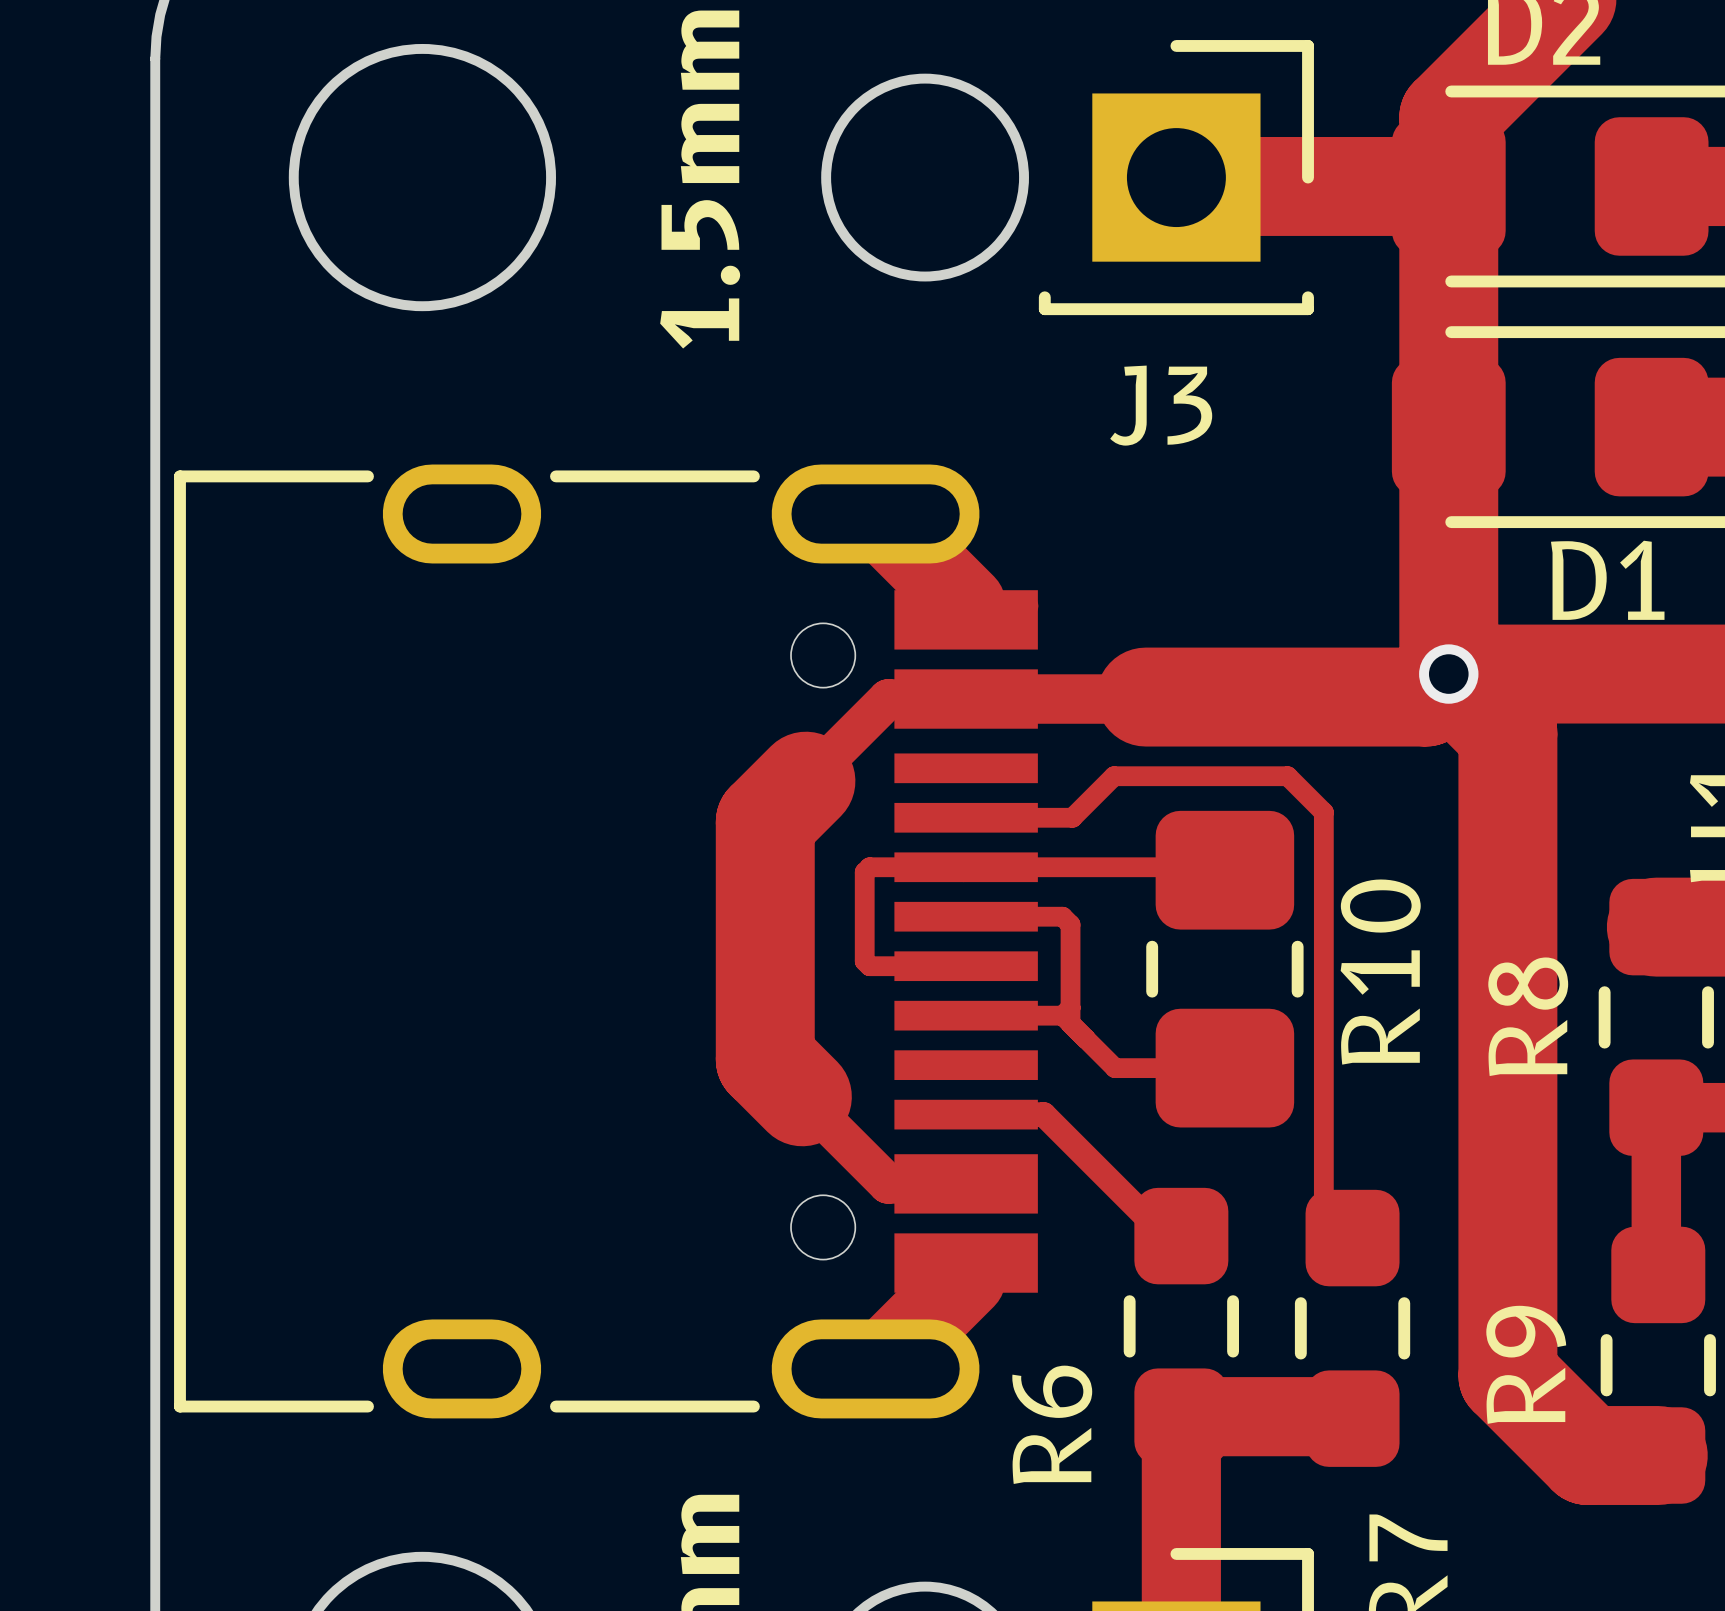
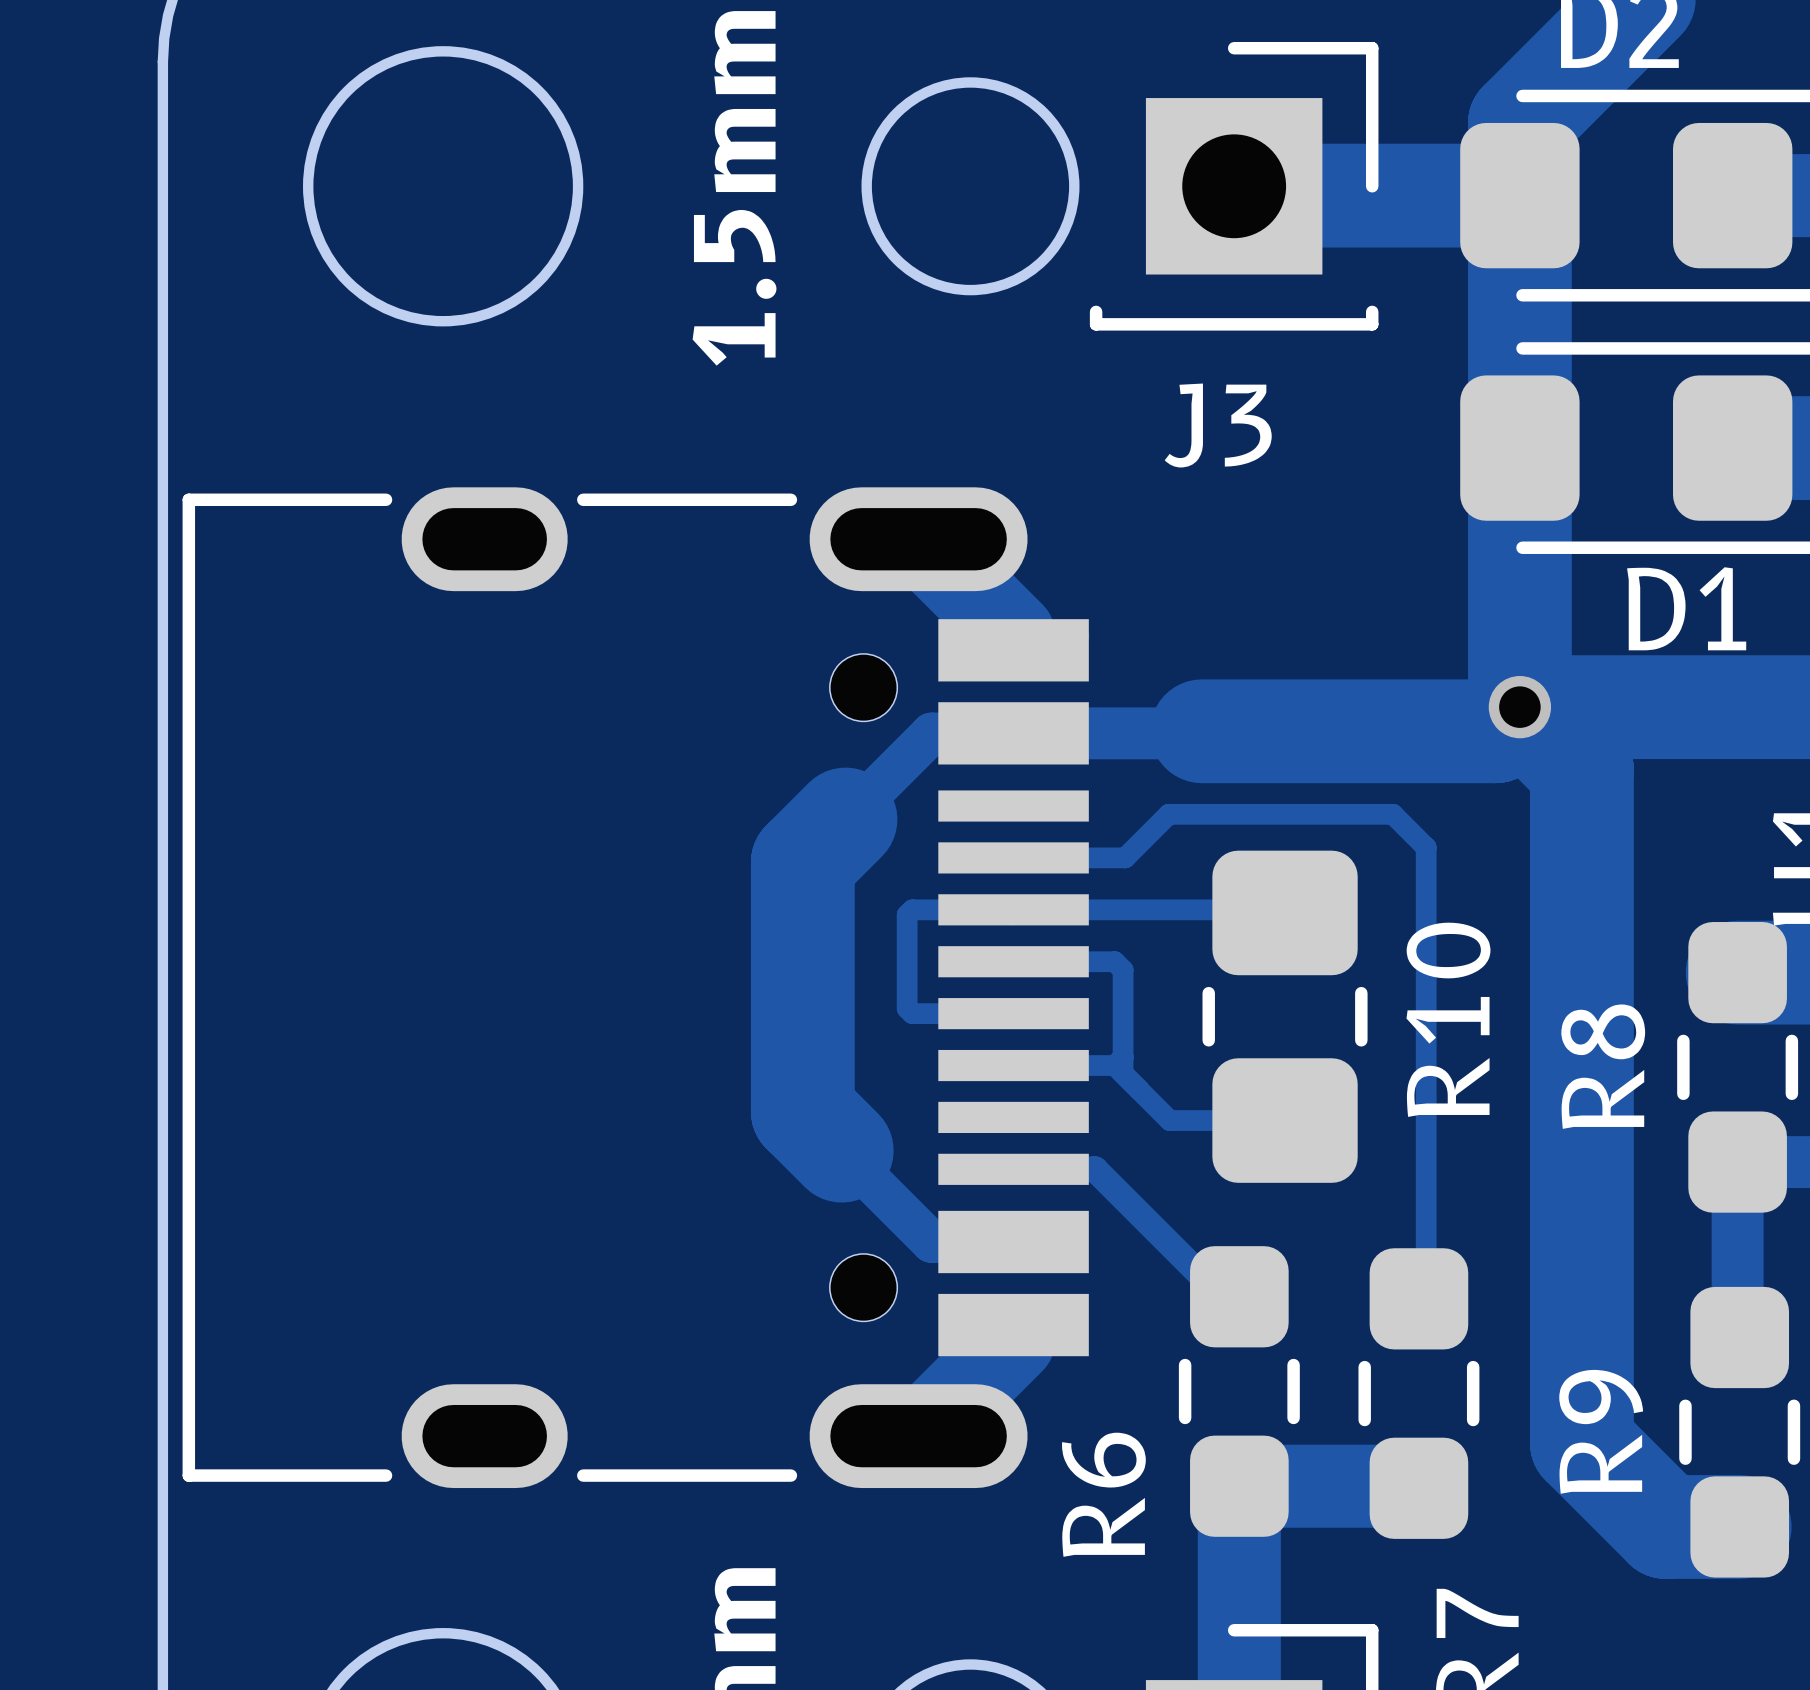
track: (1287, 776) (1323, 812) (1323, 1198) (1359, 1234) -> (1350, 814) (1392, 814) (1426, 847) (1426, 1294)

